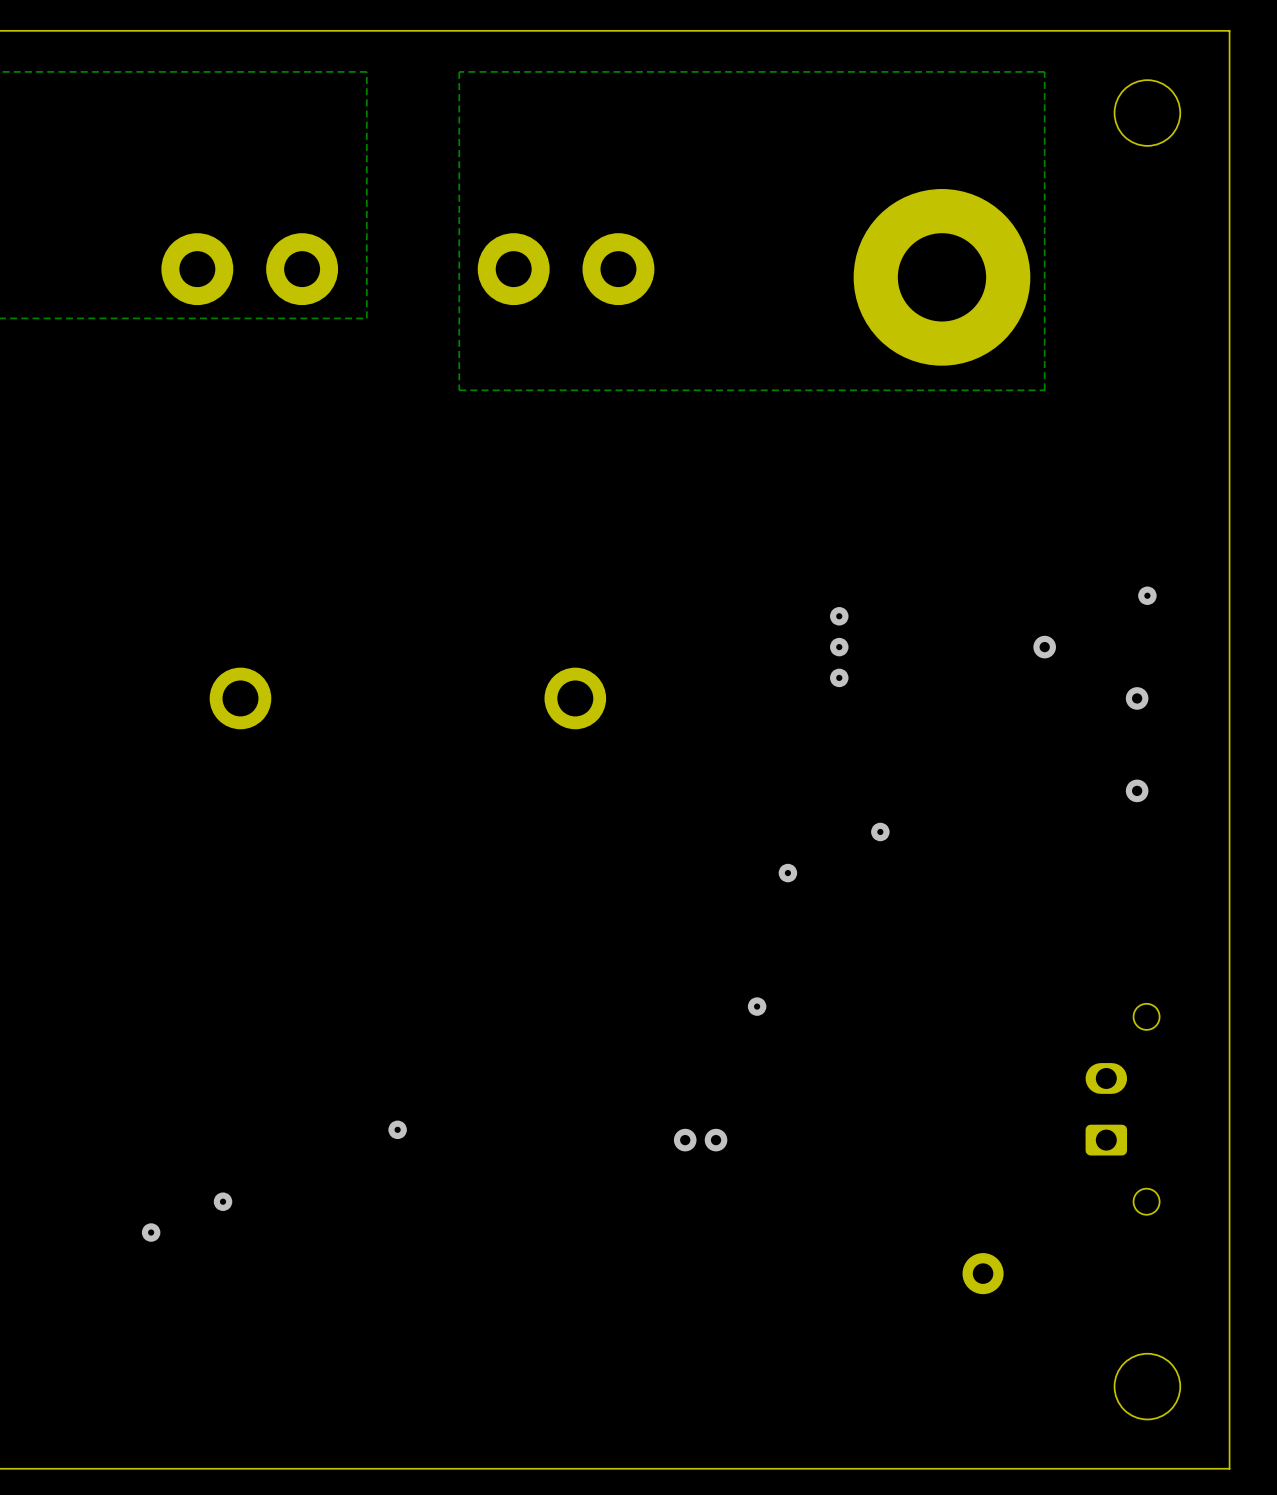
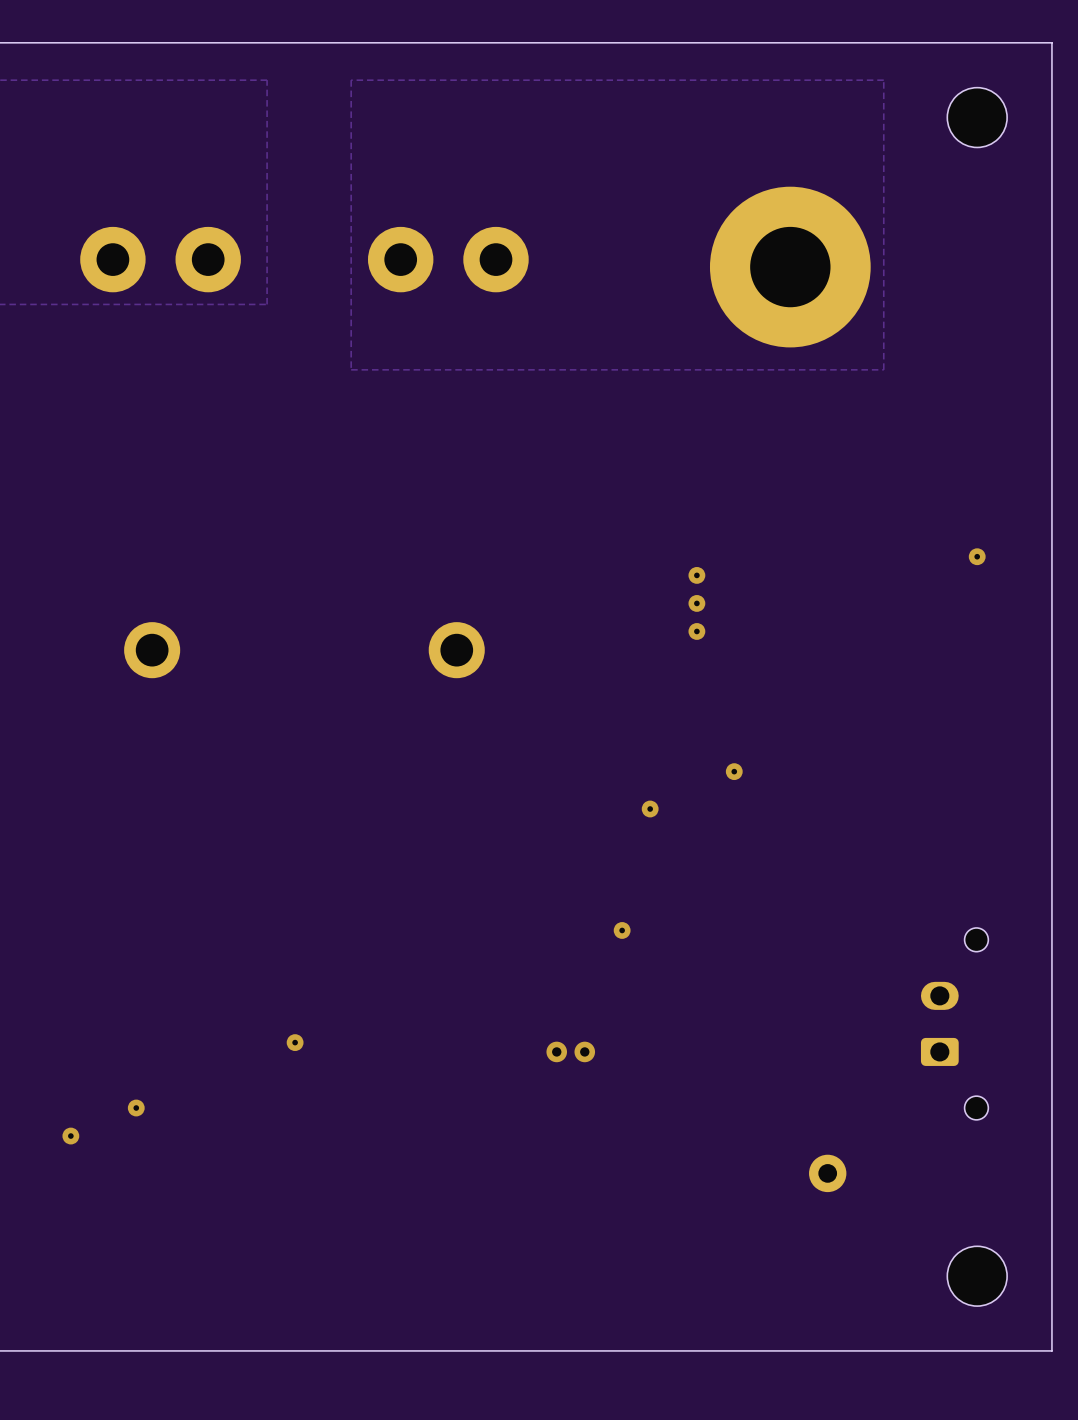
via: (1044, 647) -> none
via: (1137, 698) -> none
via: (1137, 790) -> none

